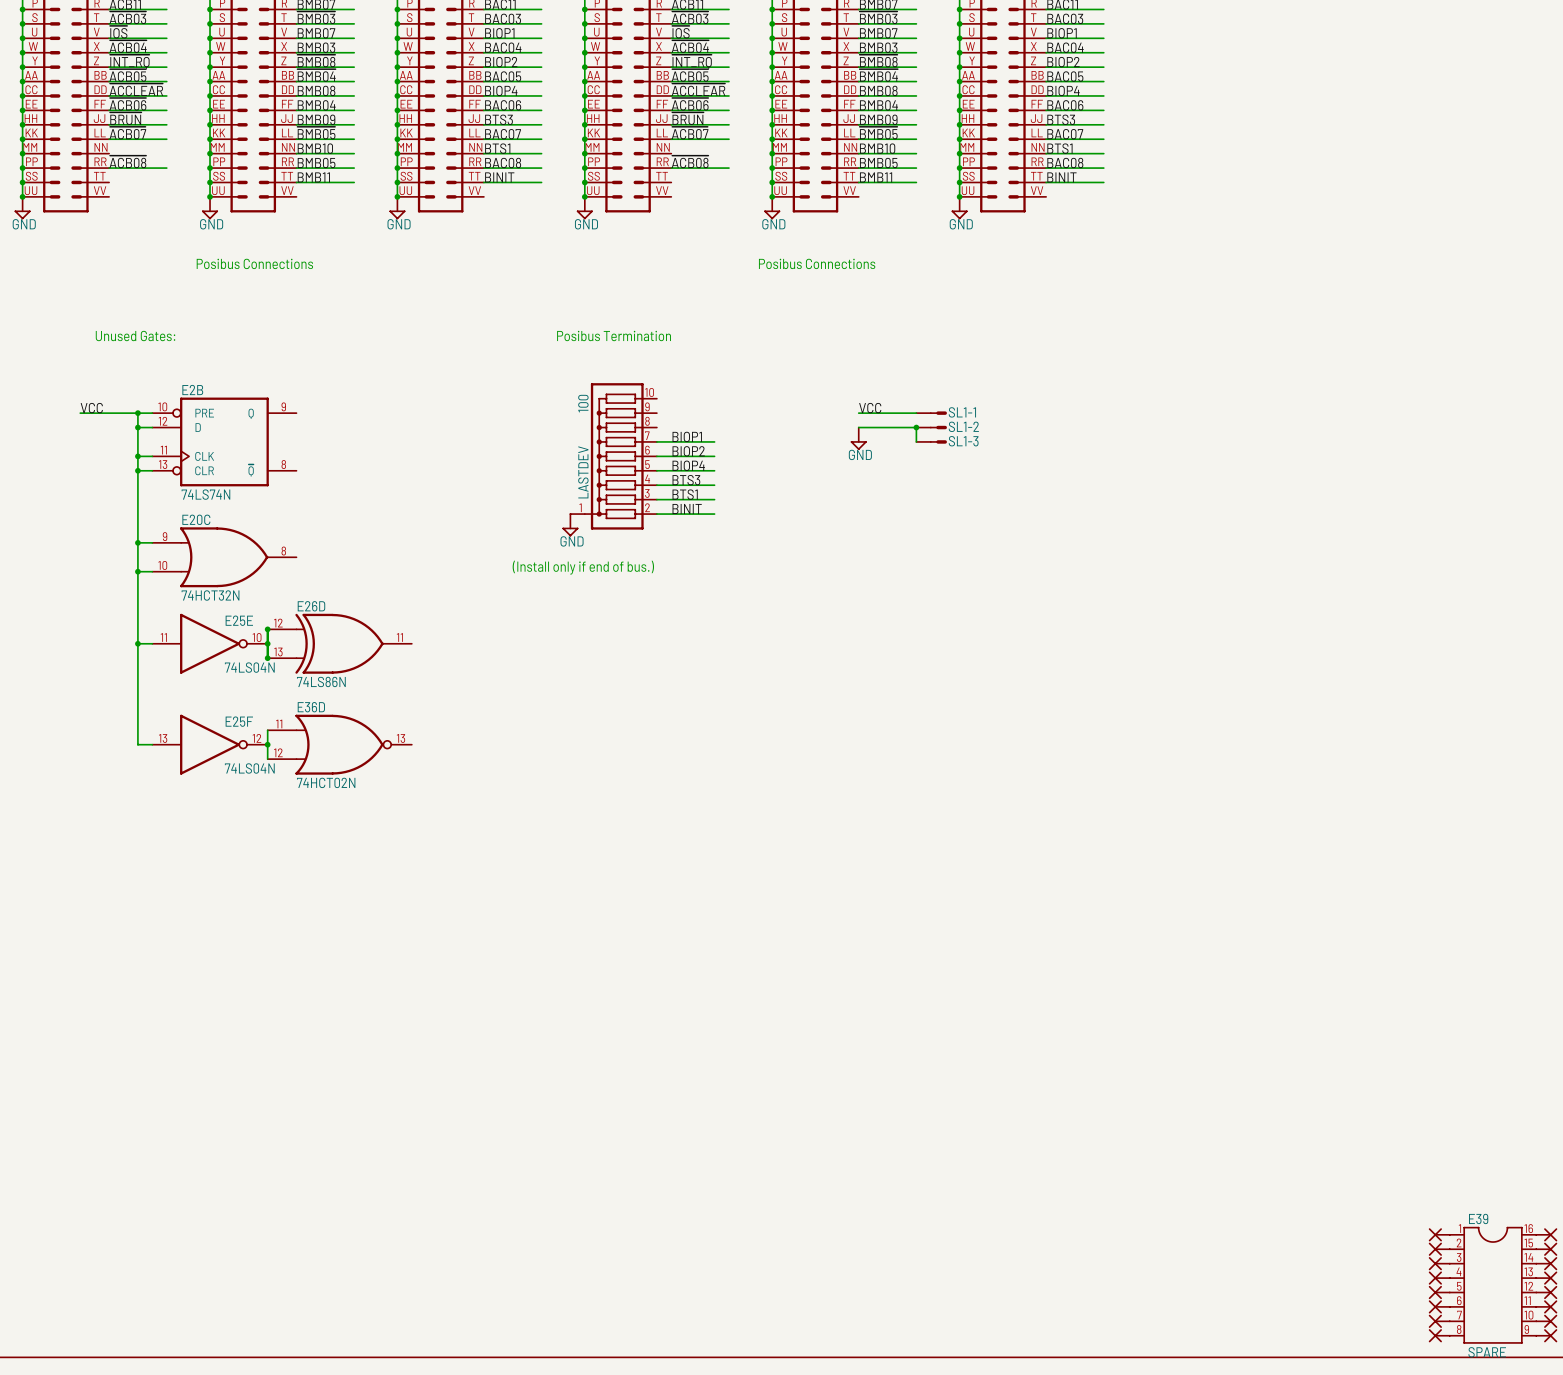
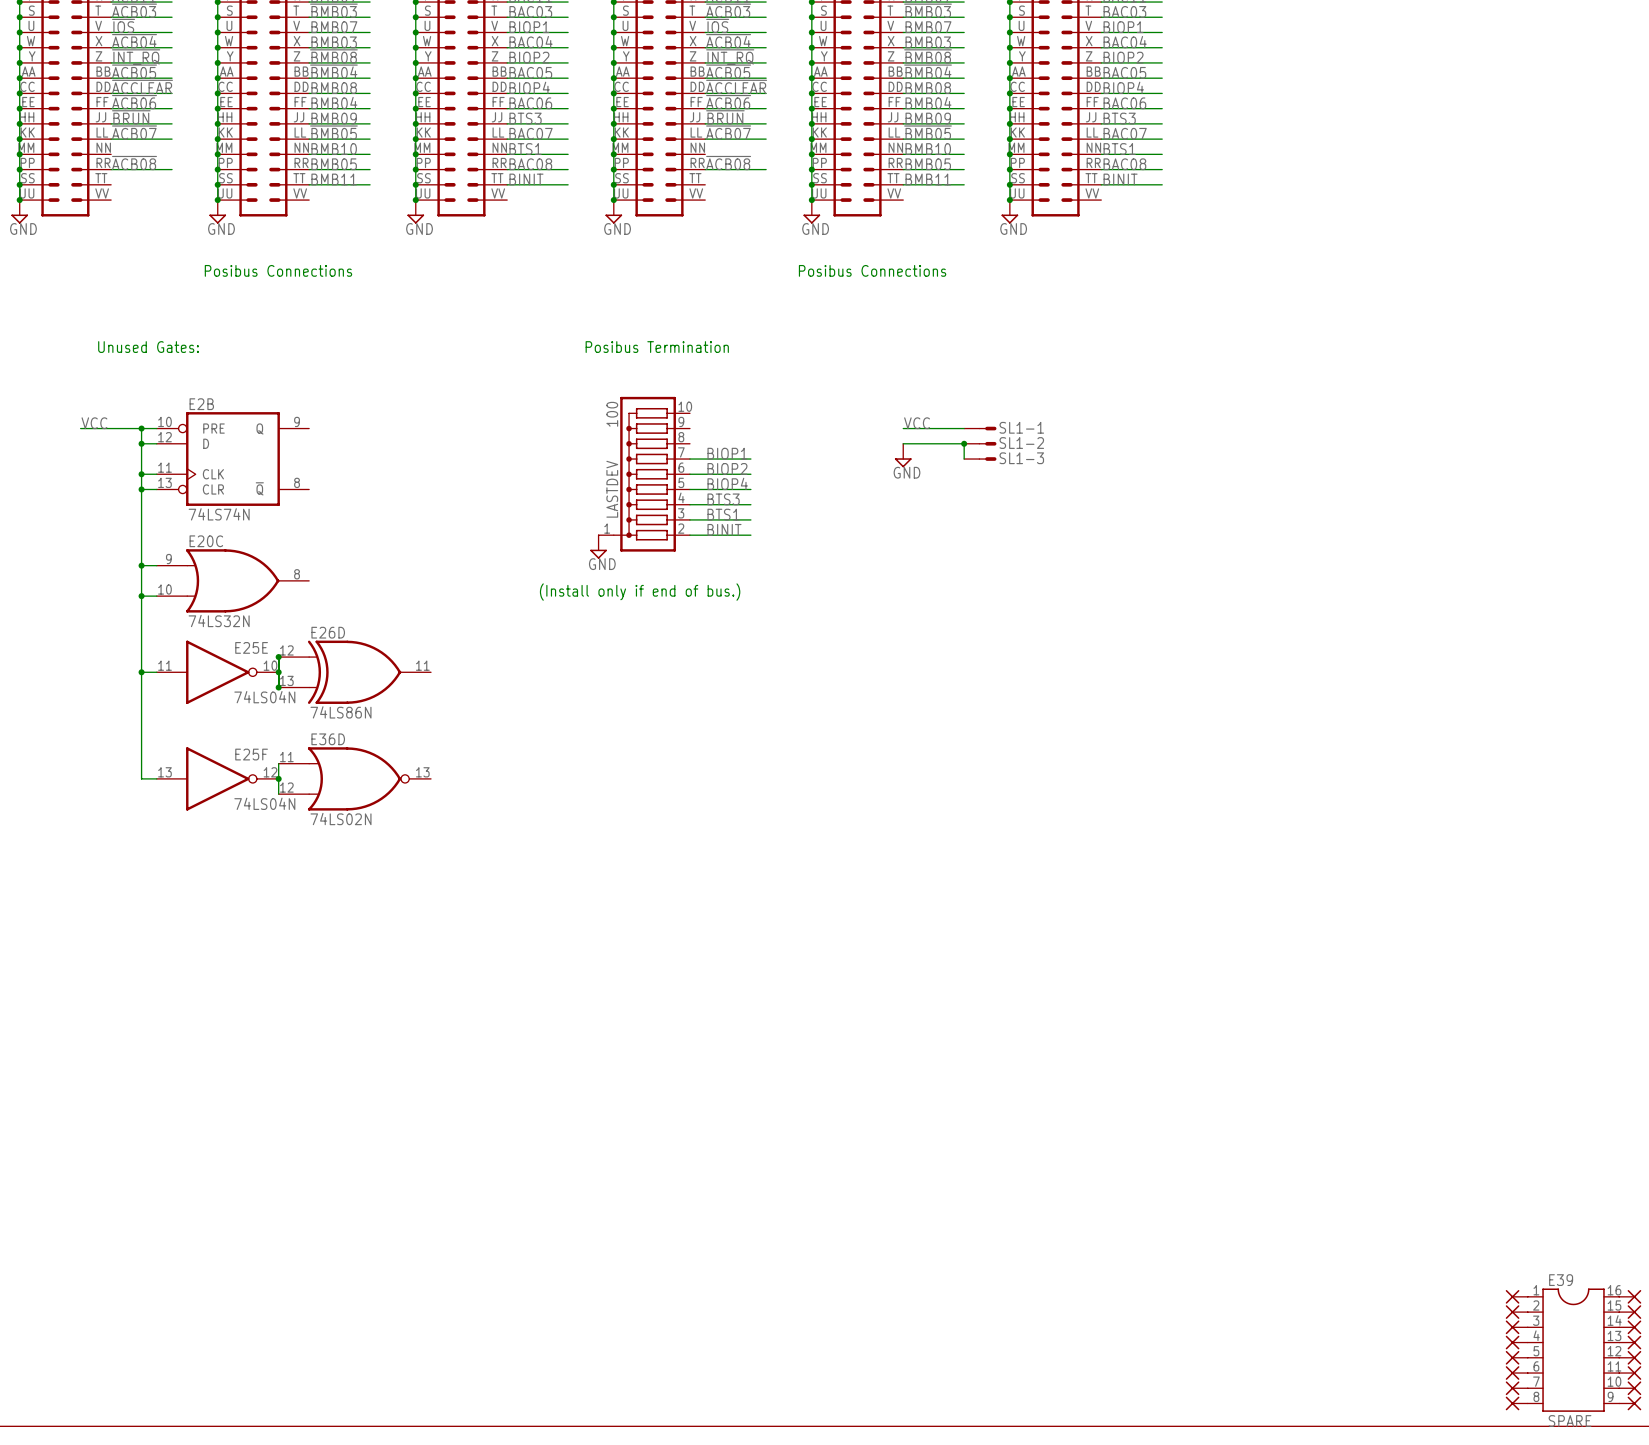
E20C value: 74HCT32N (210, 595) -> 74LS32N (219, 621)
E36D value: 74HCT02N (326, 782) -> 74LS02N (341, 819)

